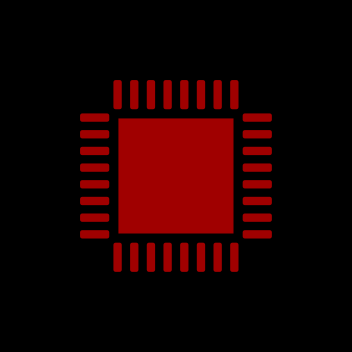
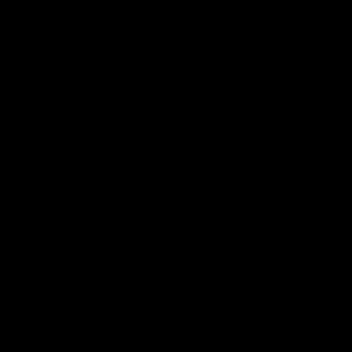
part: (175, 175) -> none

